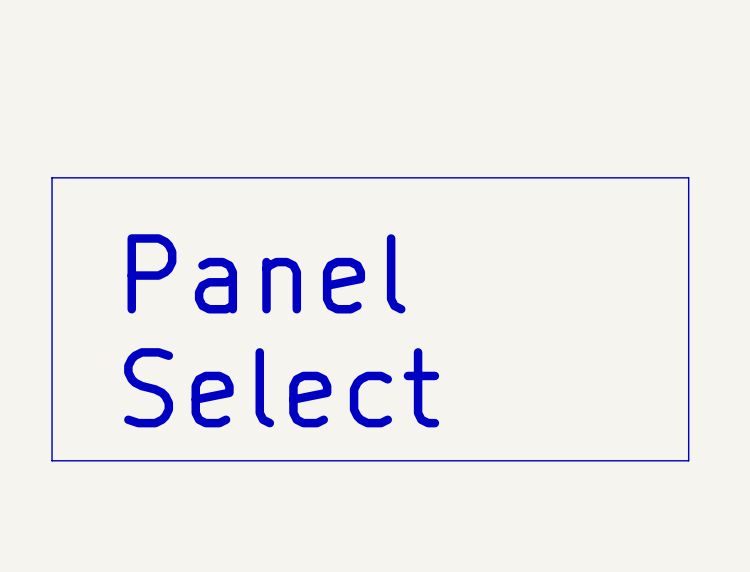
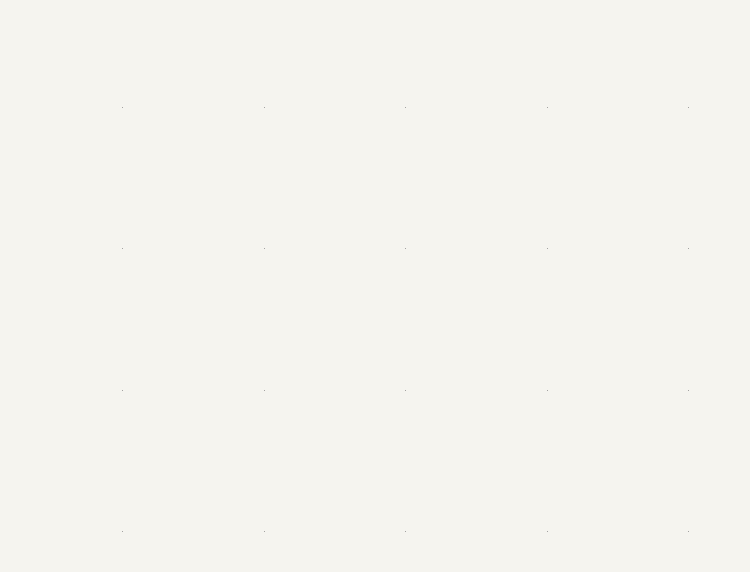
line: (52, 177) (688, 177) (688, 460) (52, 460) (52, 177) -> none
text: Panel (266, 273) -> none
text: Select (281, 387) -> none

